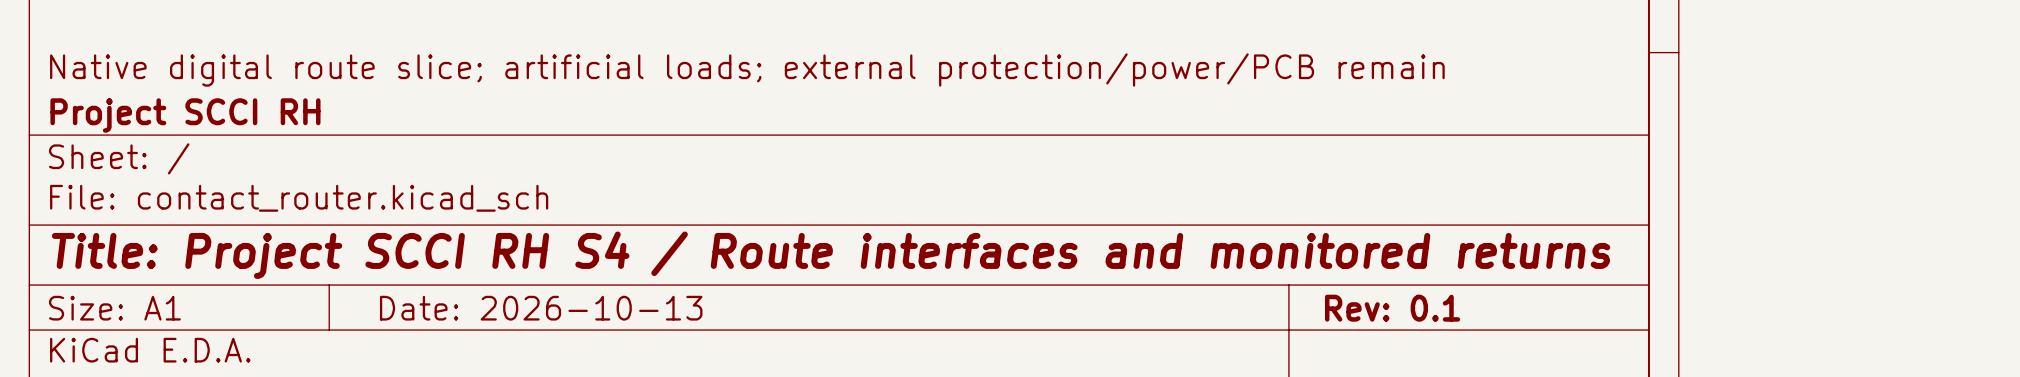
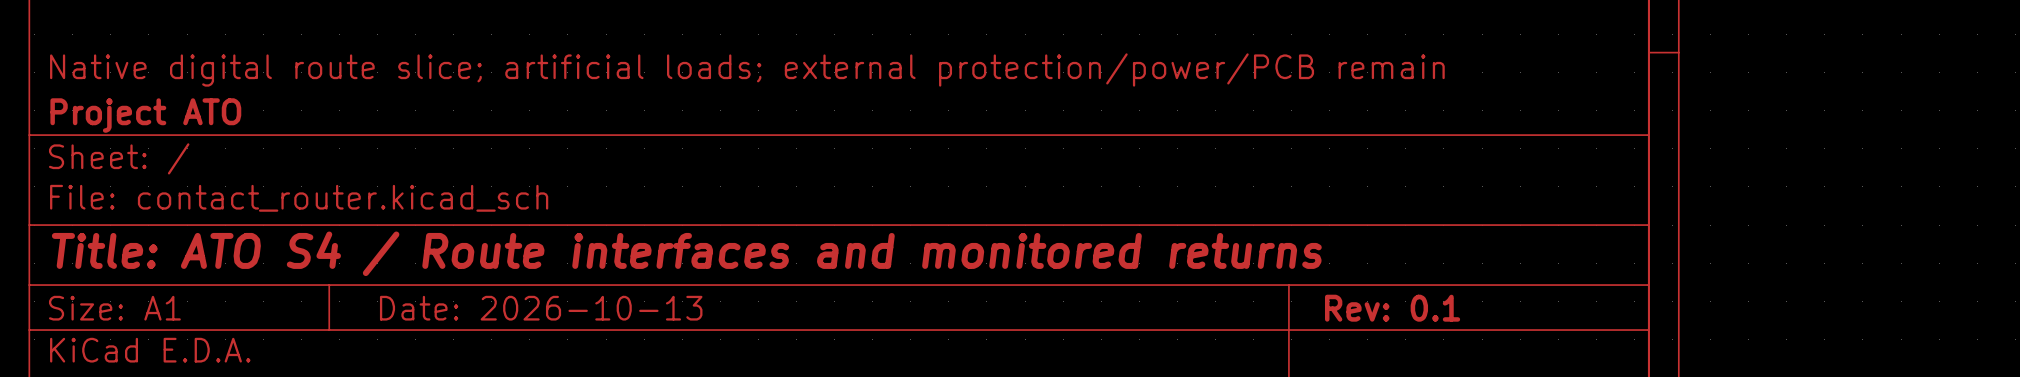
title block: Project SCCI RH (185, 115) -> Project ATO (145, 115)
title block: Title: Project SCCI RH S4 / Route interfaces and monitored returns (831, 255) -> Title: ATO S4 / Route interfaces and monitored returns (686, 253)

